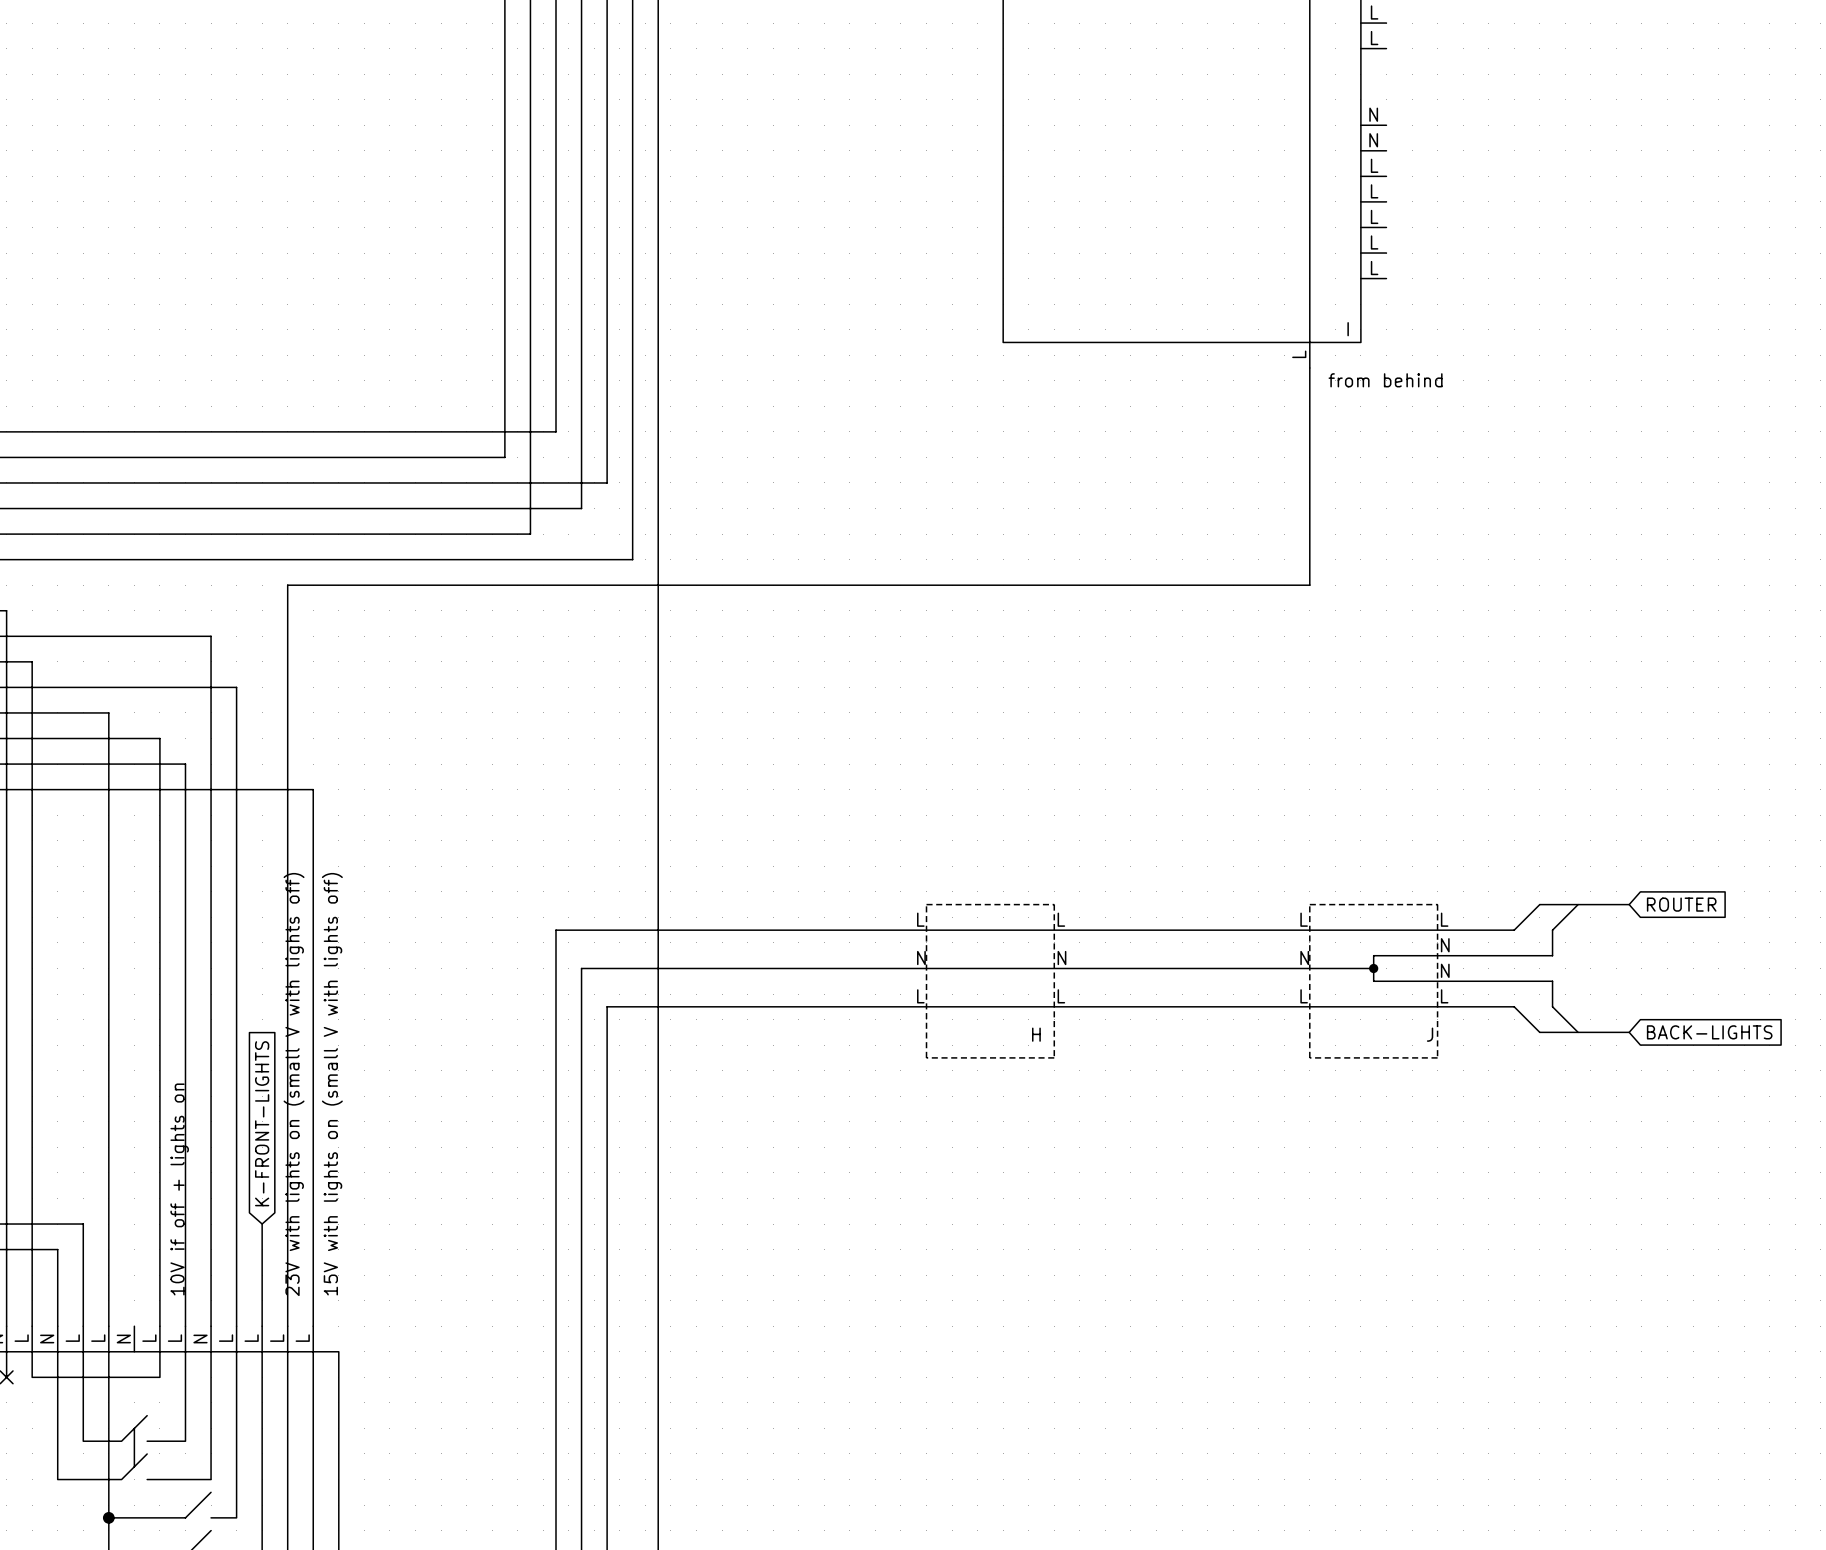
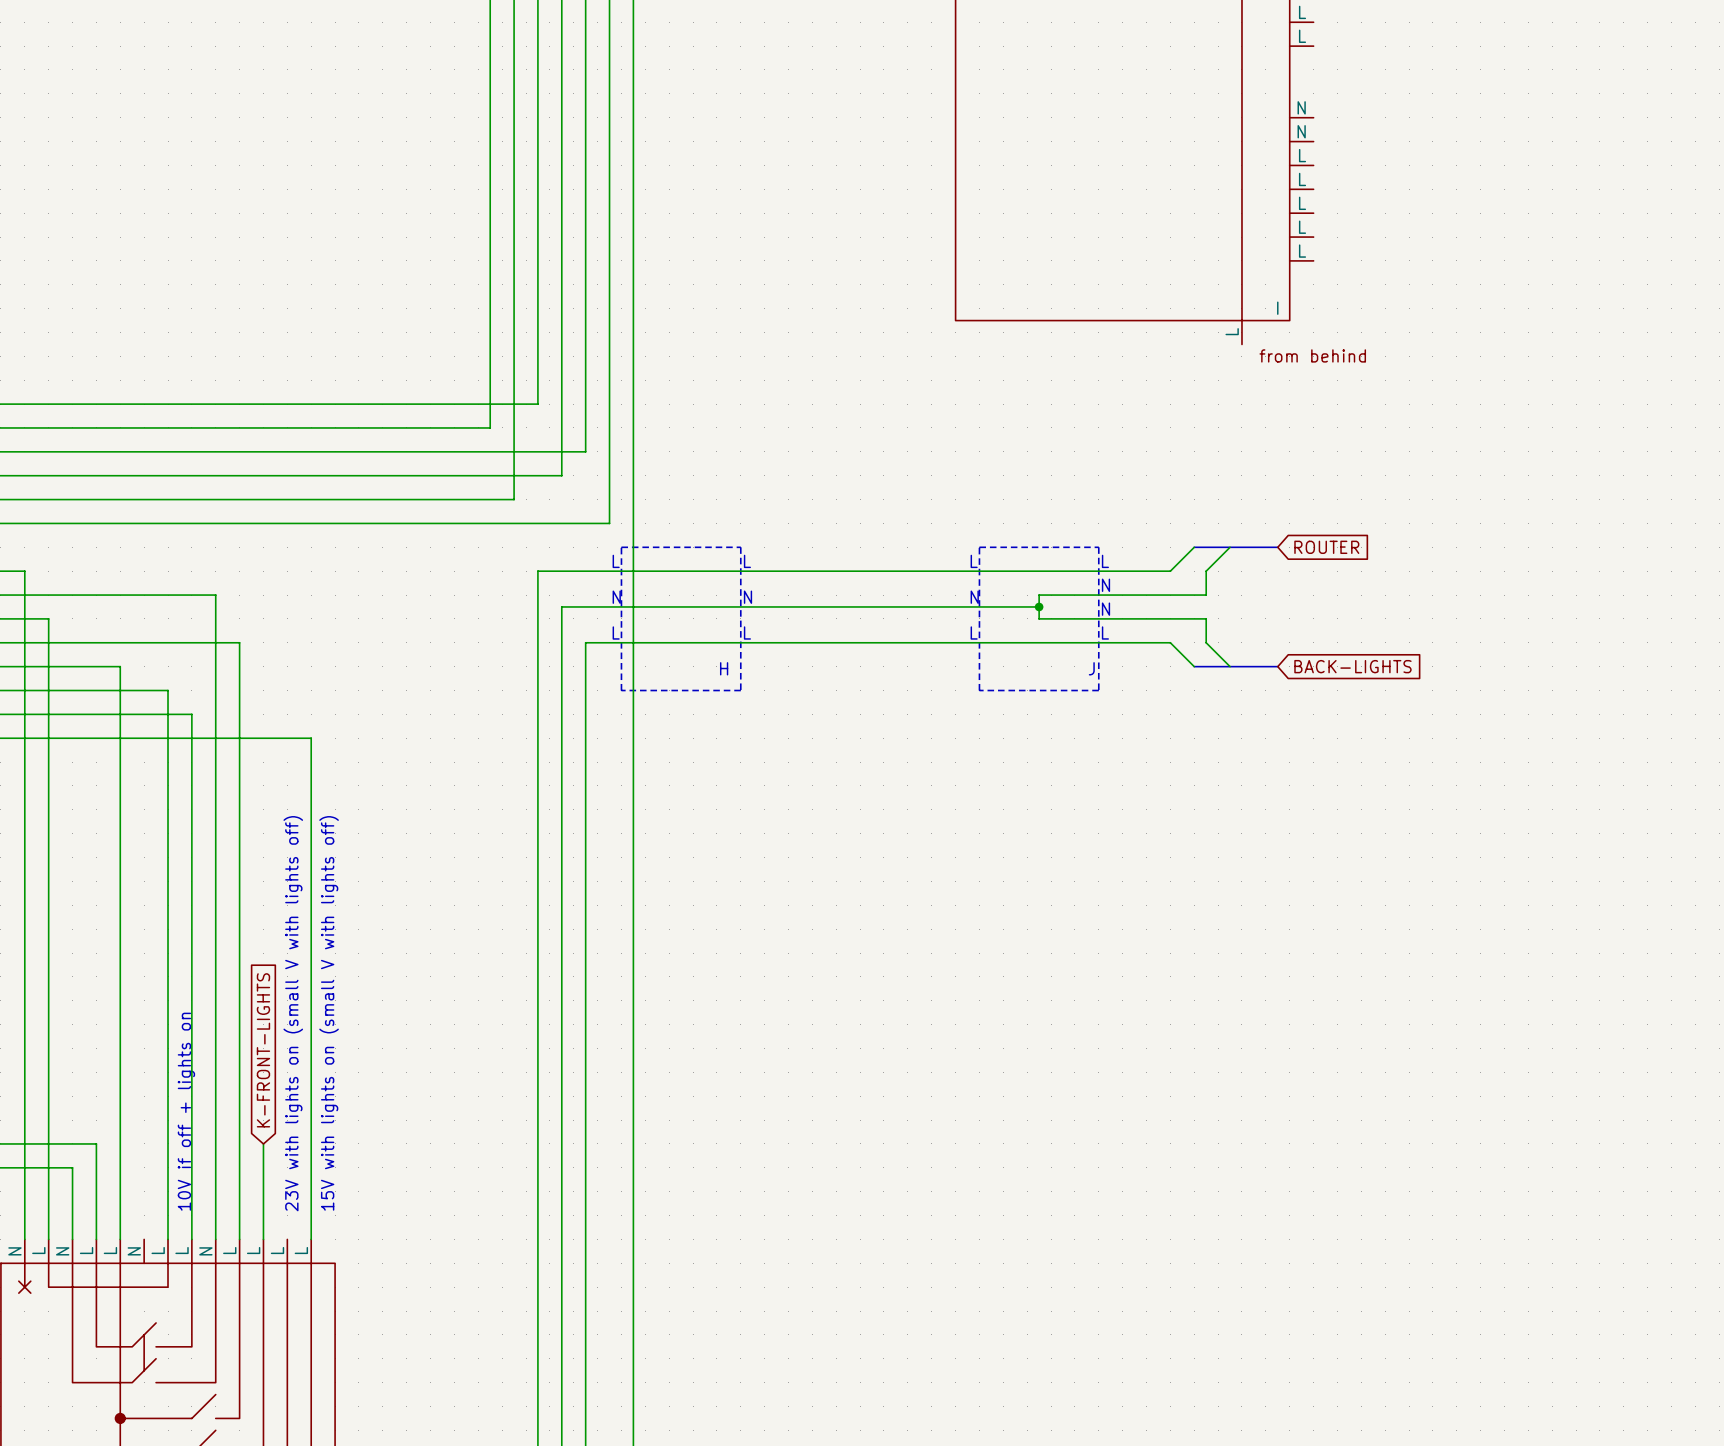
wire: (1309, 368) (1309, 585) (287, 585) (287, 1326) -> none
line: none -> (621, 547) (740, 547) (740, 690) (621, 690) (621, 547)
line: none -> (979, 547) (1098, 547) (1098, 690) (979, 690) (979, 547)
bus: none -> (1194, 547) (1277, 547)
wire: none -> (1230, 547) (1206, 571) (1206, 595) (1039, 595) (1039, 618) (1206, 618) (1206, 642) (1230, 666)
global label: none -> ROUTER (1326, 547)
text: none -> L (616, 561)
text: none -> L (747, 561)
text: none -> L (974, 561)
text: none -> L (1105, 561)
text: none -> N (1105, 585)
text: none -> N (616, 597)
text: none -> N (747, 597)
text: none -> N (974, 597)
junction: none -> (1039, 606)
text: none -> N (1105, 609)
text: none -> L (616, 633)
text: none -> L (747, 633)
text: none -> L (974, 633)
text: none -> L (1105, 633)
bus: none -> (1194, 666) (1277, 666)
global label: none -> BACK-LIGHTS (1352, 666)
text: none -> H (724, 668)
text: none -> J (1091, 668)
line: (926, 904) (1054, 904) (1054, 1057) (926, 1057) (926, 904) -> none
line: (1309, 904) (1437, 904) (1437, 1057) (1309, 1057) (1309, 904) -> none
wire: (1539, 904) (1514, 930) (556, 930) -> (1194, 547) (1170, 571) (537, 571) (537, 869)
bus: (1539, 904) (1629, 904) -> none
wire: (1578, 904) (1552, 930) (1552, 955) (1373, 955) (1373, 981) (1552, 981) (1552, 1006) (1578, 1032) -> none
global label: ROUTER (1681, 904) -> none
text: L (920, 919) -> none
text: L (1061, 919) -> none
text: L (1304, 919) -> none
text: L (1444, 919) -> none
text: N (1445, 945) -> none
text: N (921, 958) -> none
text: N (1061, 958) -> none
text: N (1304, 958) -> none
wire: (581, 968) (1373, 968) -> (561, 905) (561, 606) (1039, 606)
junction: (1373, 968) -> none
text: N (1445, 970) -> none
text: L (920, 996) -> none
text: L (1061, 996) -> none
text: L (1304, 996) -> none
text: L (1444, 996) -> none
wire: (607, 1006) (1514, 1006) (1539, 1032) -> (585, 941) (585, 642) (1170, 642) (1194, 666)
bus: (1539, 1032) (1629, 1032) -> none
global label: BACK-LIGHTS (1709, 1032) -> none
text: H (1036, 1034) -> none
text: J (1430, 1034) -> none

